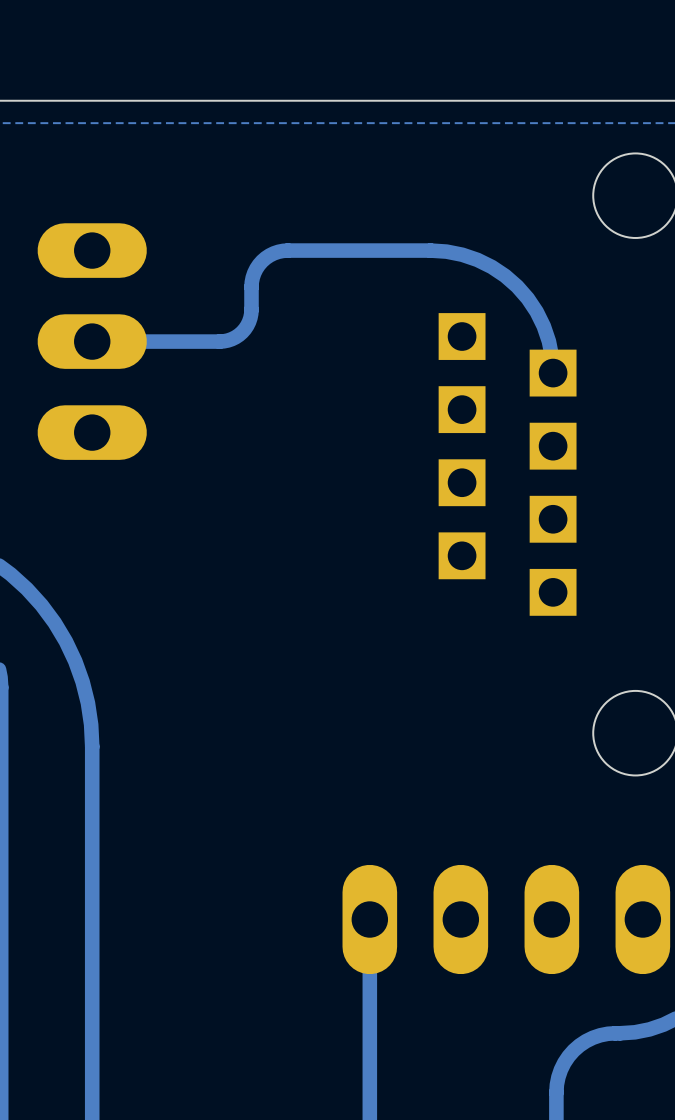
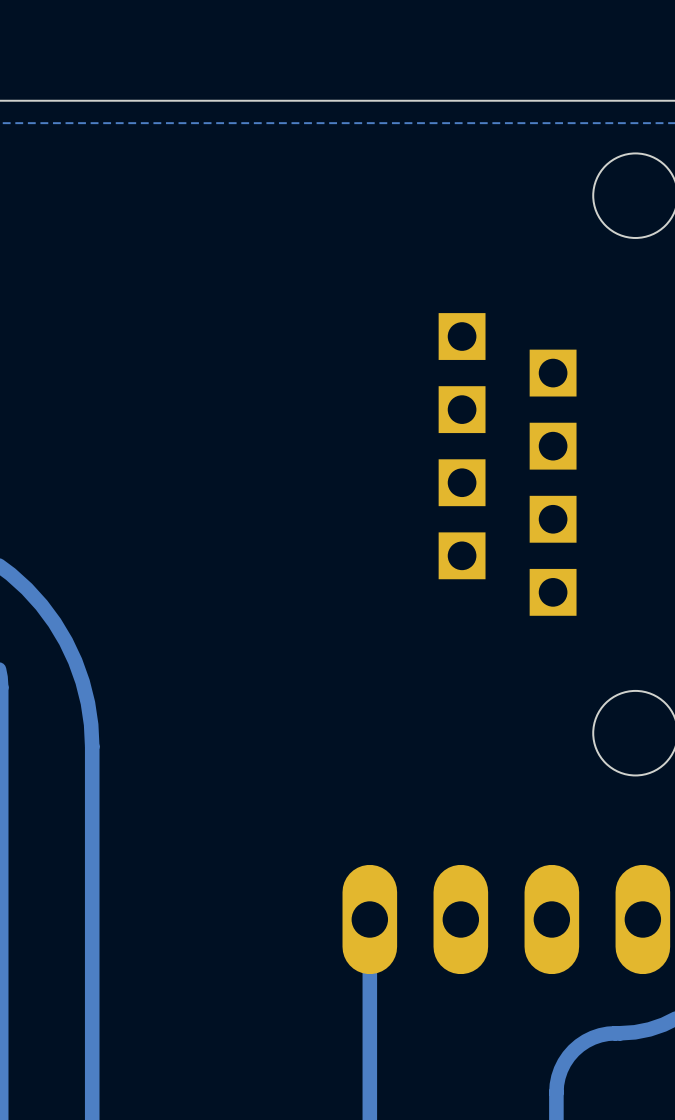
track: (92, 341) (219, 341) (231, 339) (242, 332) (249, 321) (251, 313) (251, 282) (256, 268) (265, 258) (278, 251) (446, 251) (462, 254) (491, 266) (505, 275) (527, 298) (543, 326) (552, 357) (553, 373) -> none
part: (92, 341) -> none

